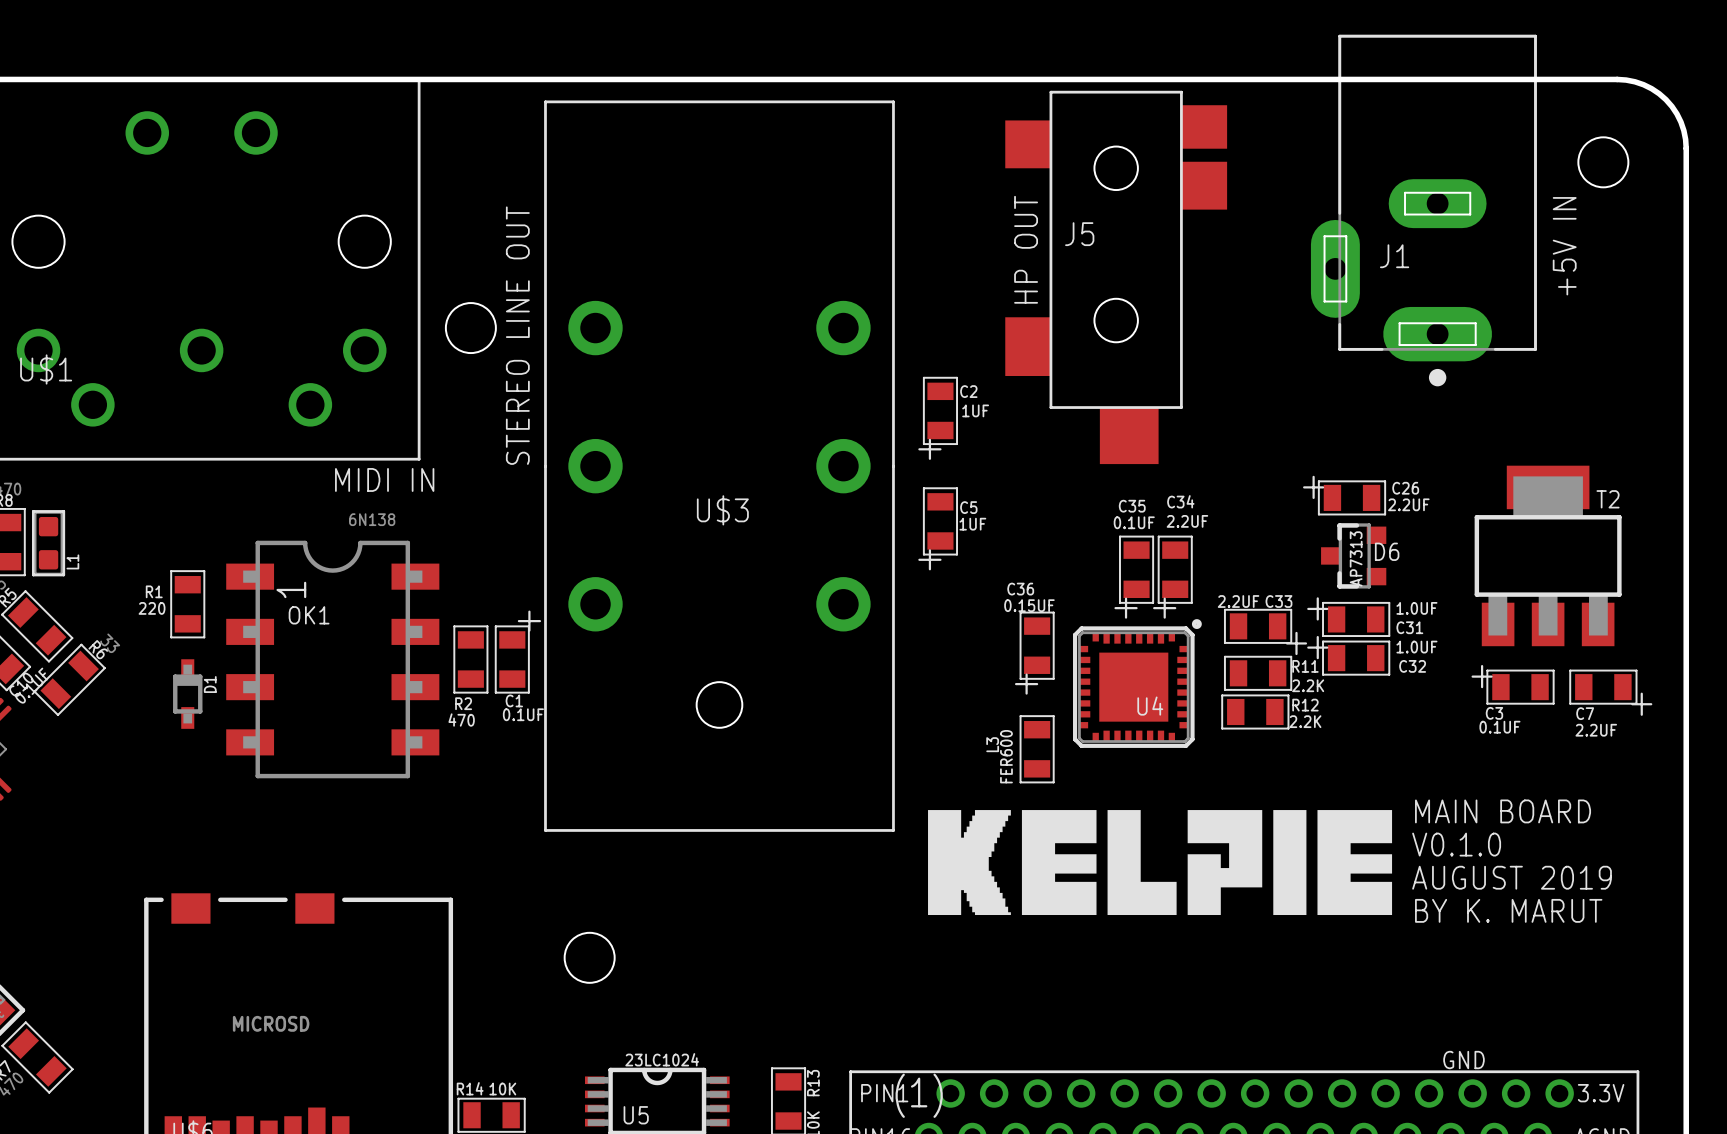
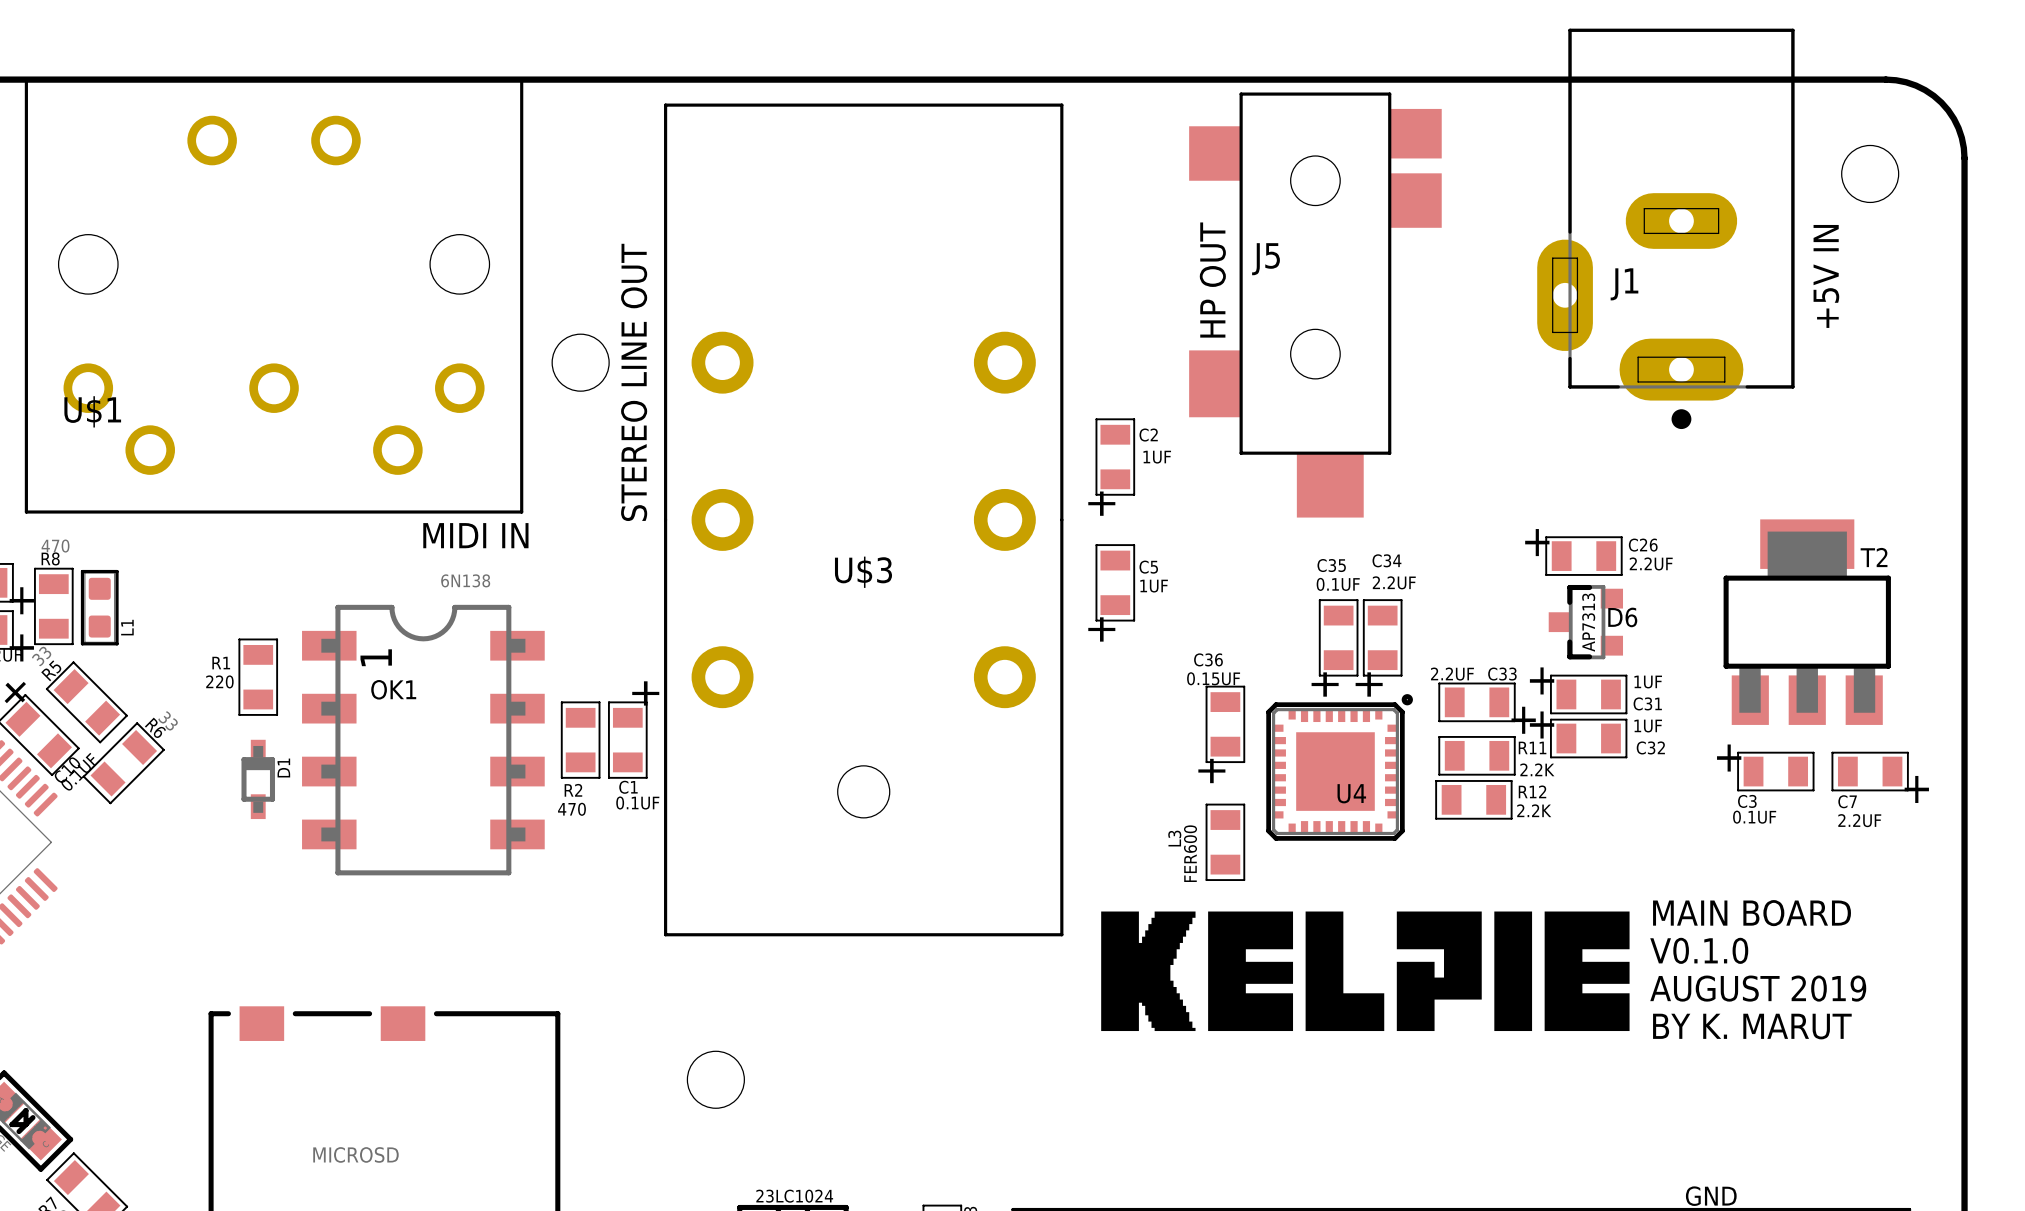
C31 value: 1.0UF (1416, 608) -> 1UF (1648, 682)
C32 value: 1.0UF (1416, 647) -> 1UF (1648, 726)

